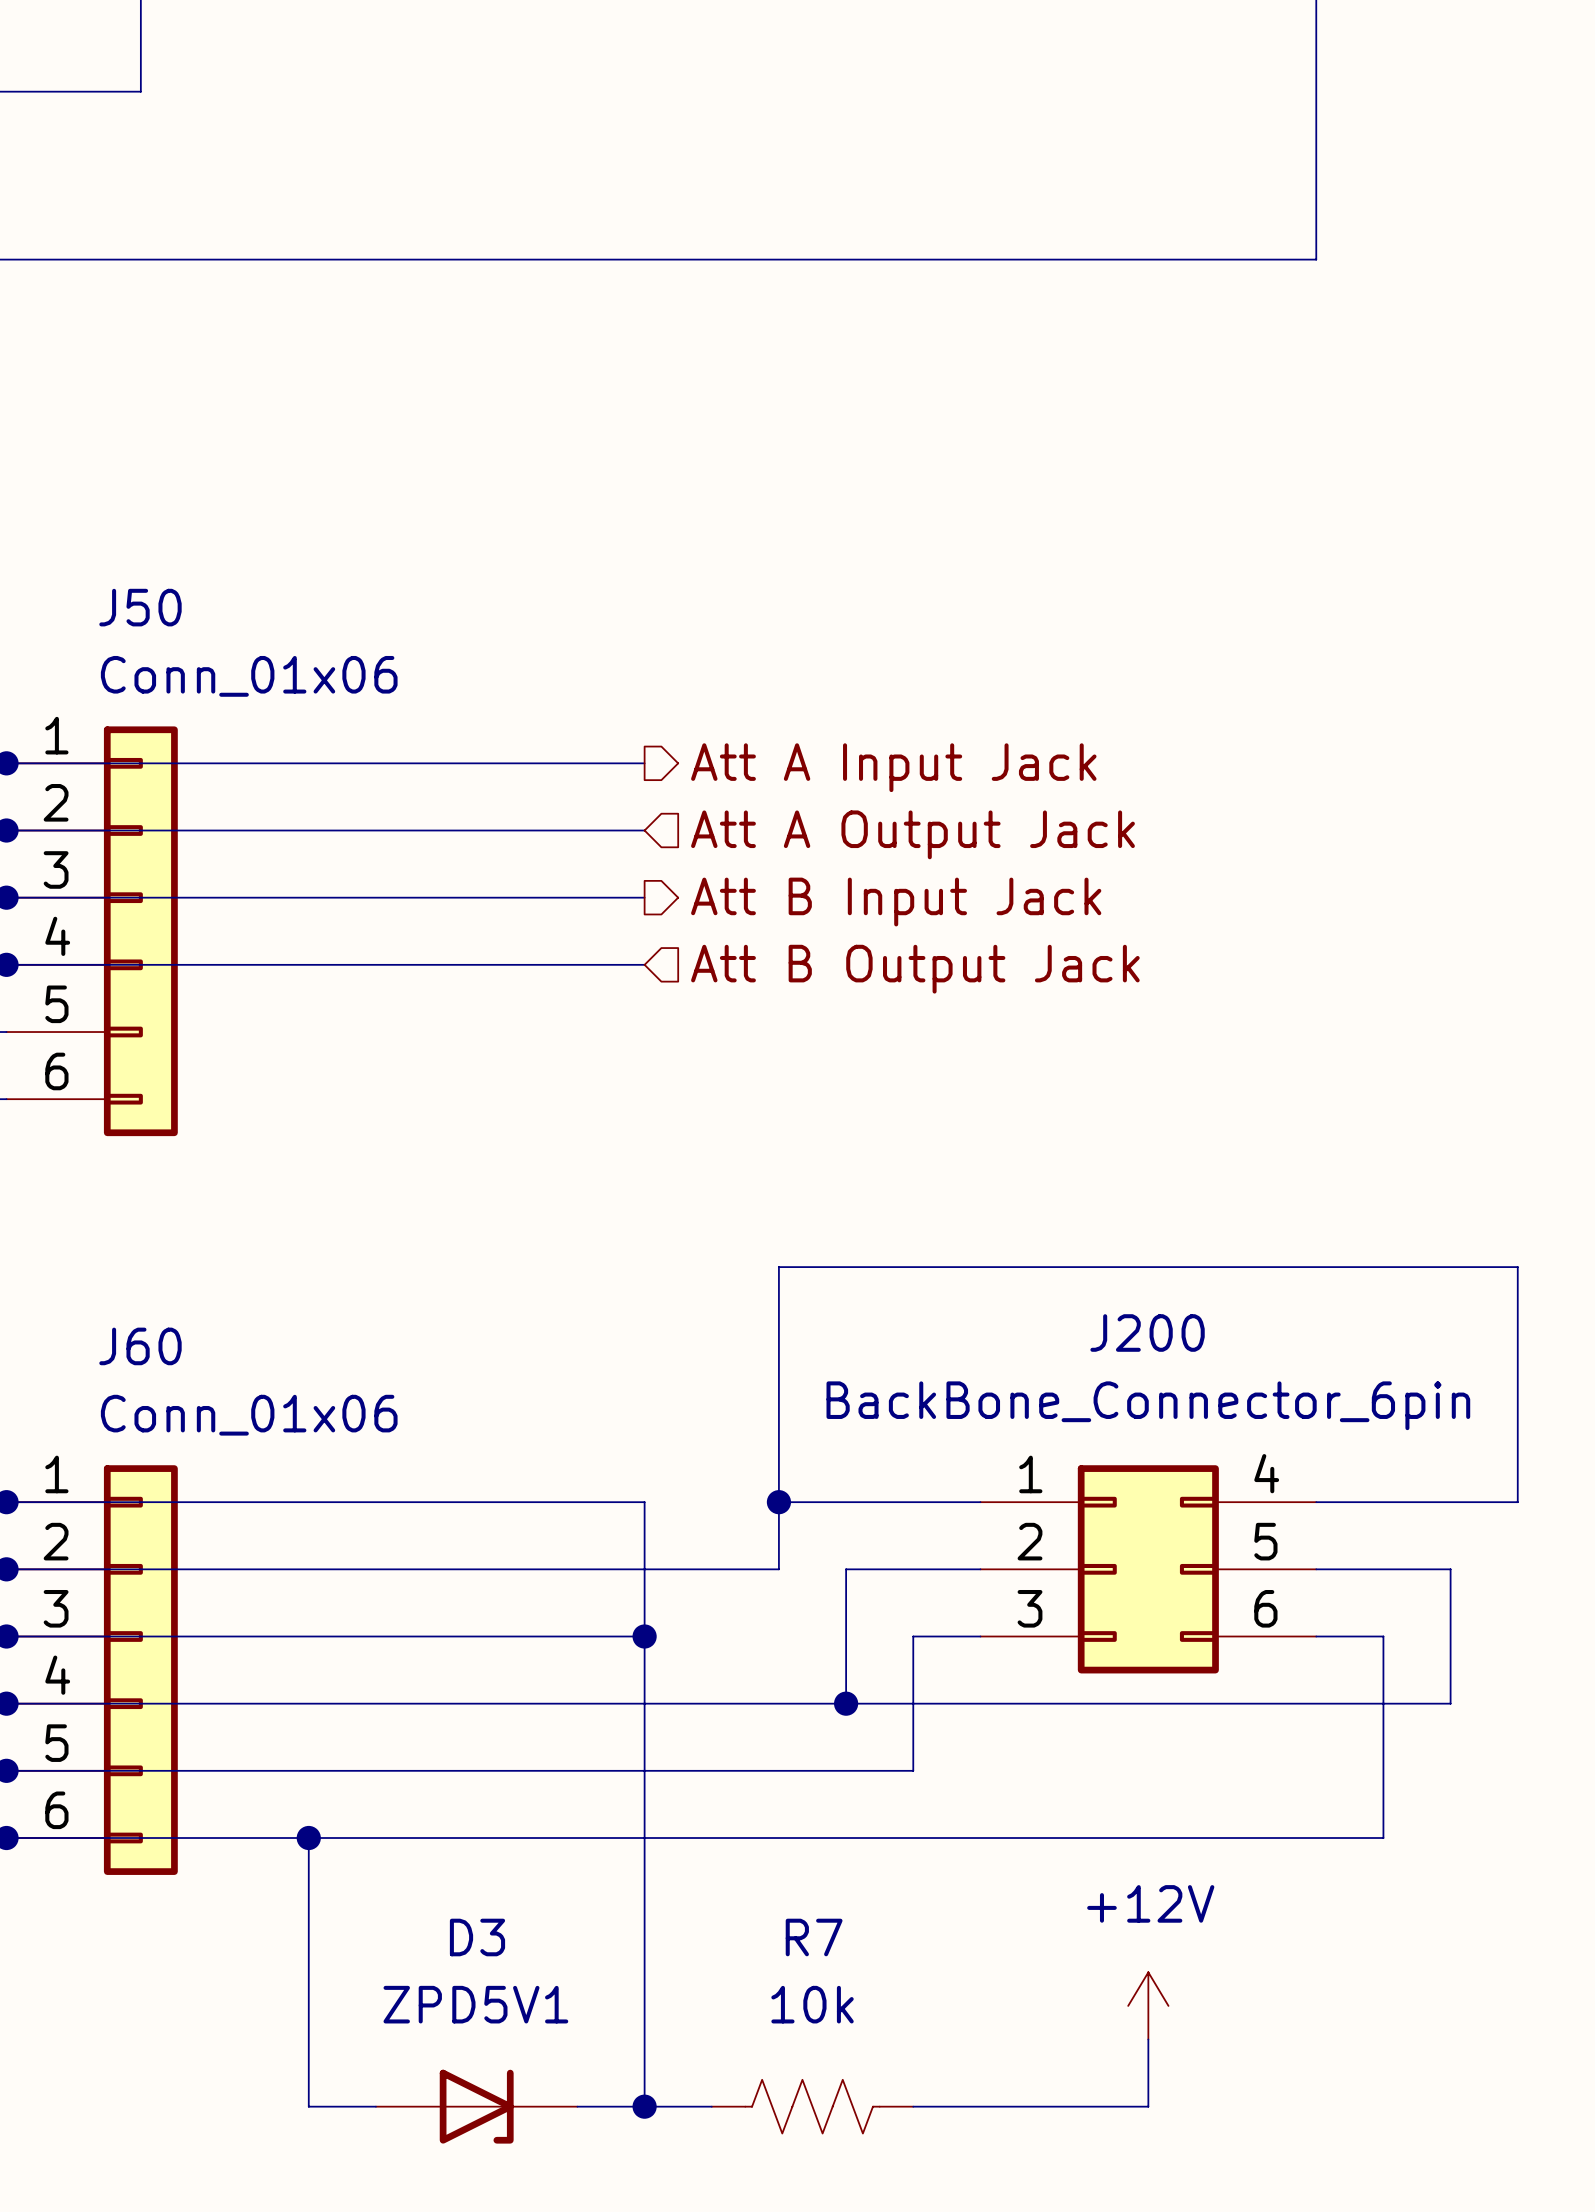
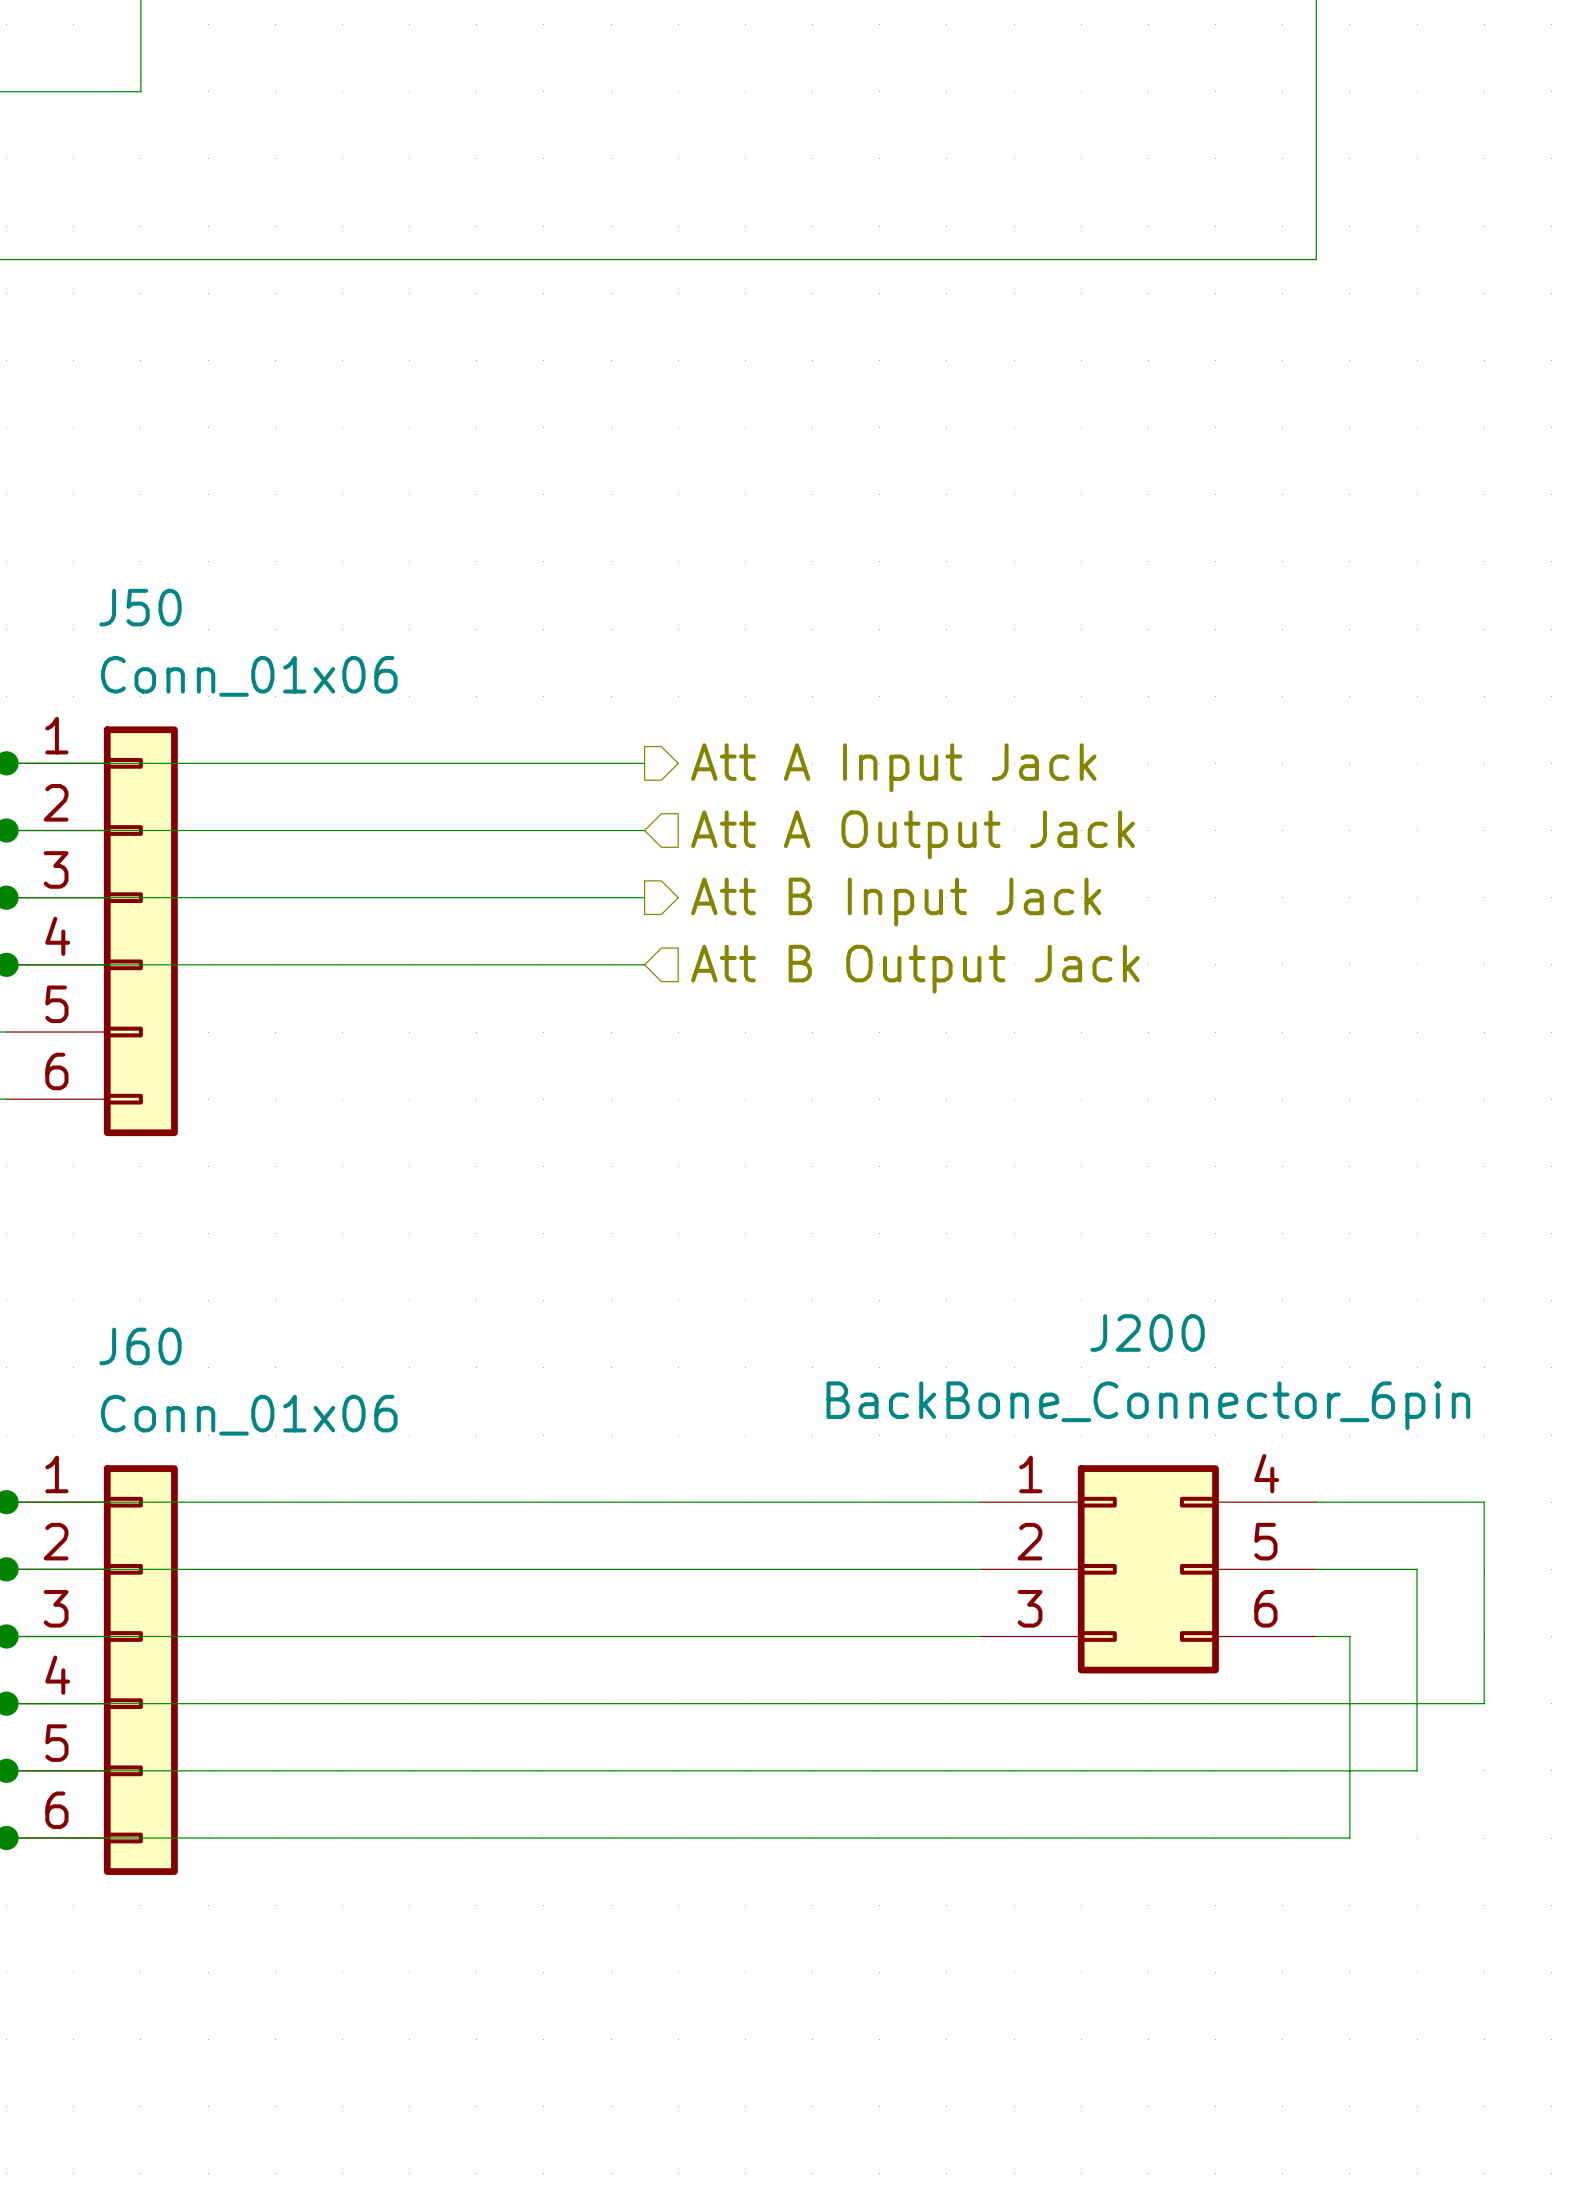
wire: (644, 1502) (644, 2106) -> (644, 1502) (778, 1502)
junction: (778, 1502) -> none
wire: (1484, 1502) (1517, 1502) (1517, 1267) (778, 1267) (778, 1569) -> none
wire: (846, 1569) (846, 1703) -> (846, 1569) (778, 1569)
wire: (1417, 1569) (1450, 1569) (1450, 1703) -> (1484, 1502) (1484, 1703) (1450, 1703)
wire: none -> (1417, 1569) (1417, 1770) (913, 1770)
junction: (644, 1636) -> none
wire: (913, 1636) (913, 1770) -> (913, 1636) (644, 1636)
wire: (1349, 1636) (1383, 1636) (1383, 1838) (1349, 1838) -> (1349, 1636) (1349, 1838)
junction: (846, 1703) -> none
wire: (308, 1838) (308, 2106) (375, 2106) -> none
junction: (308, 1838) -> none
power symbol: +12V (1148, 2005) -> none
wire: (1148, 2039) (1148, 2106) (913, 2106) -> none
D3: ZPD5V1 (476, 2106) -> none
wire: (577, 2106) (711, 2106) -> none
junction: (644, 2106) -> none
R7: 10k (812, 2106) -> none

